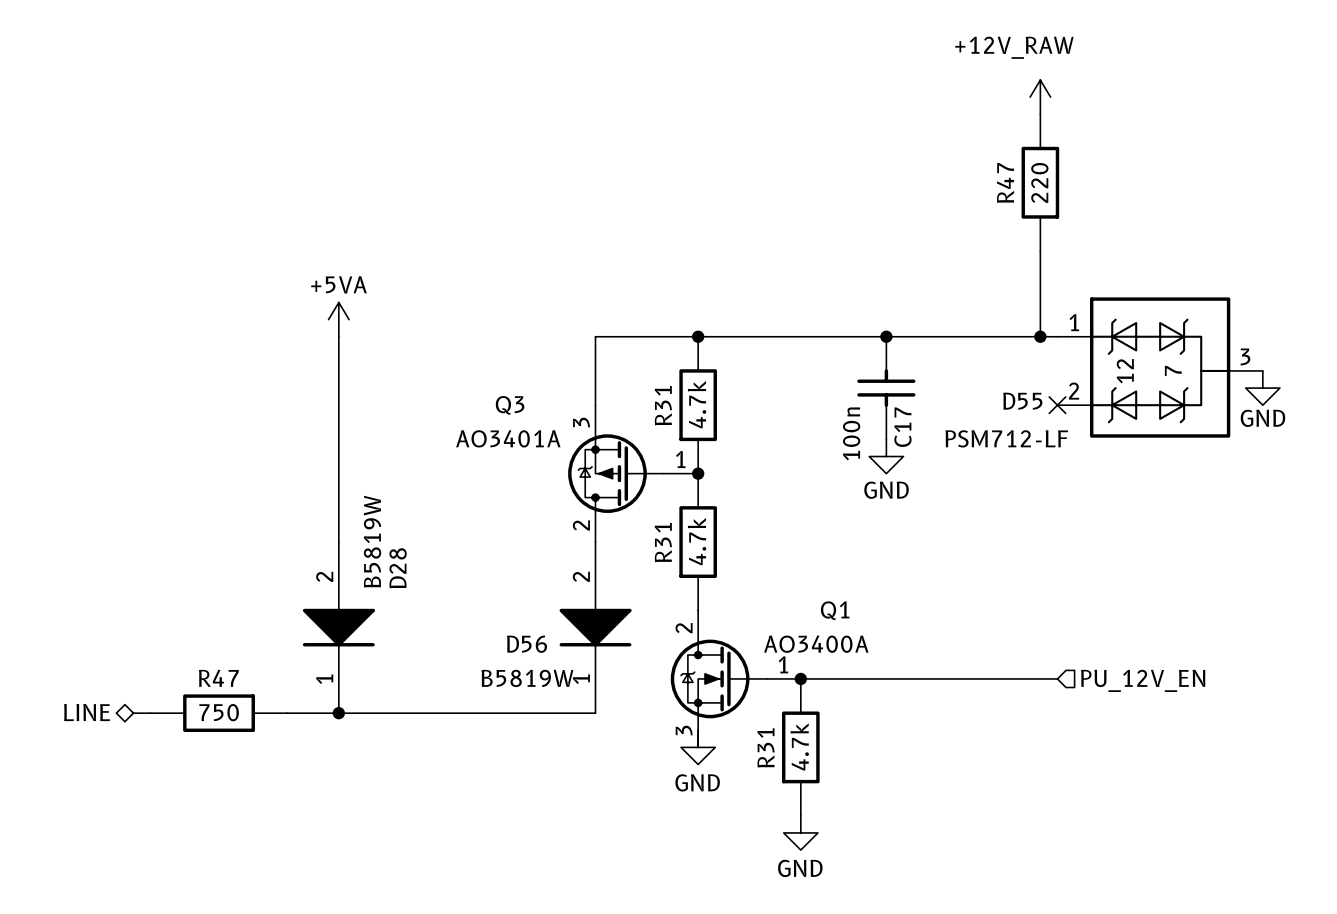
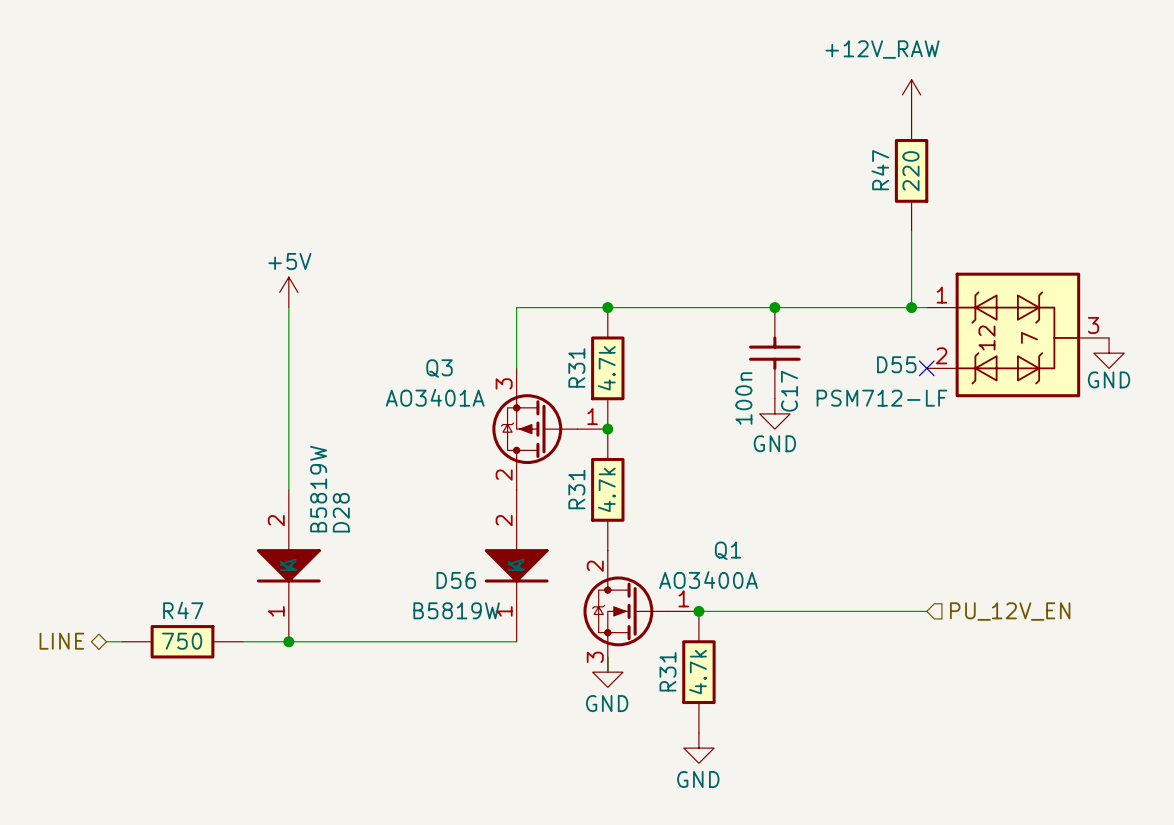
power symbol: +5VA (338, 319) -> +5V (288, 292)

